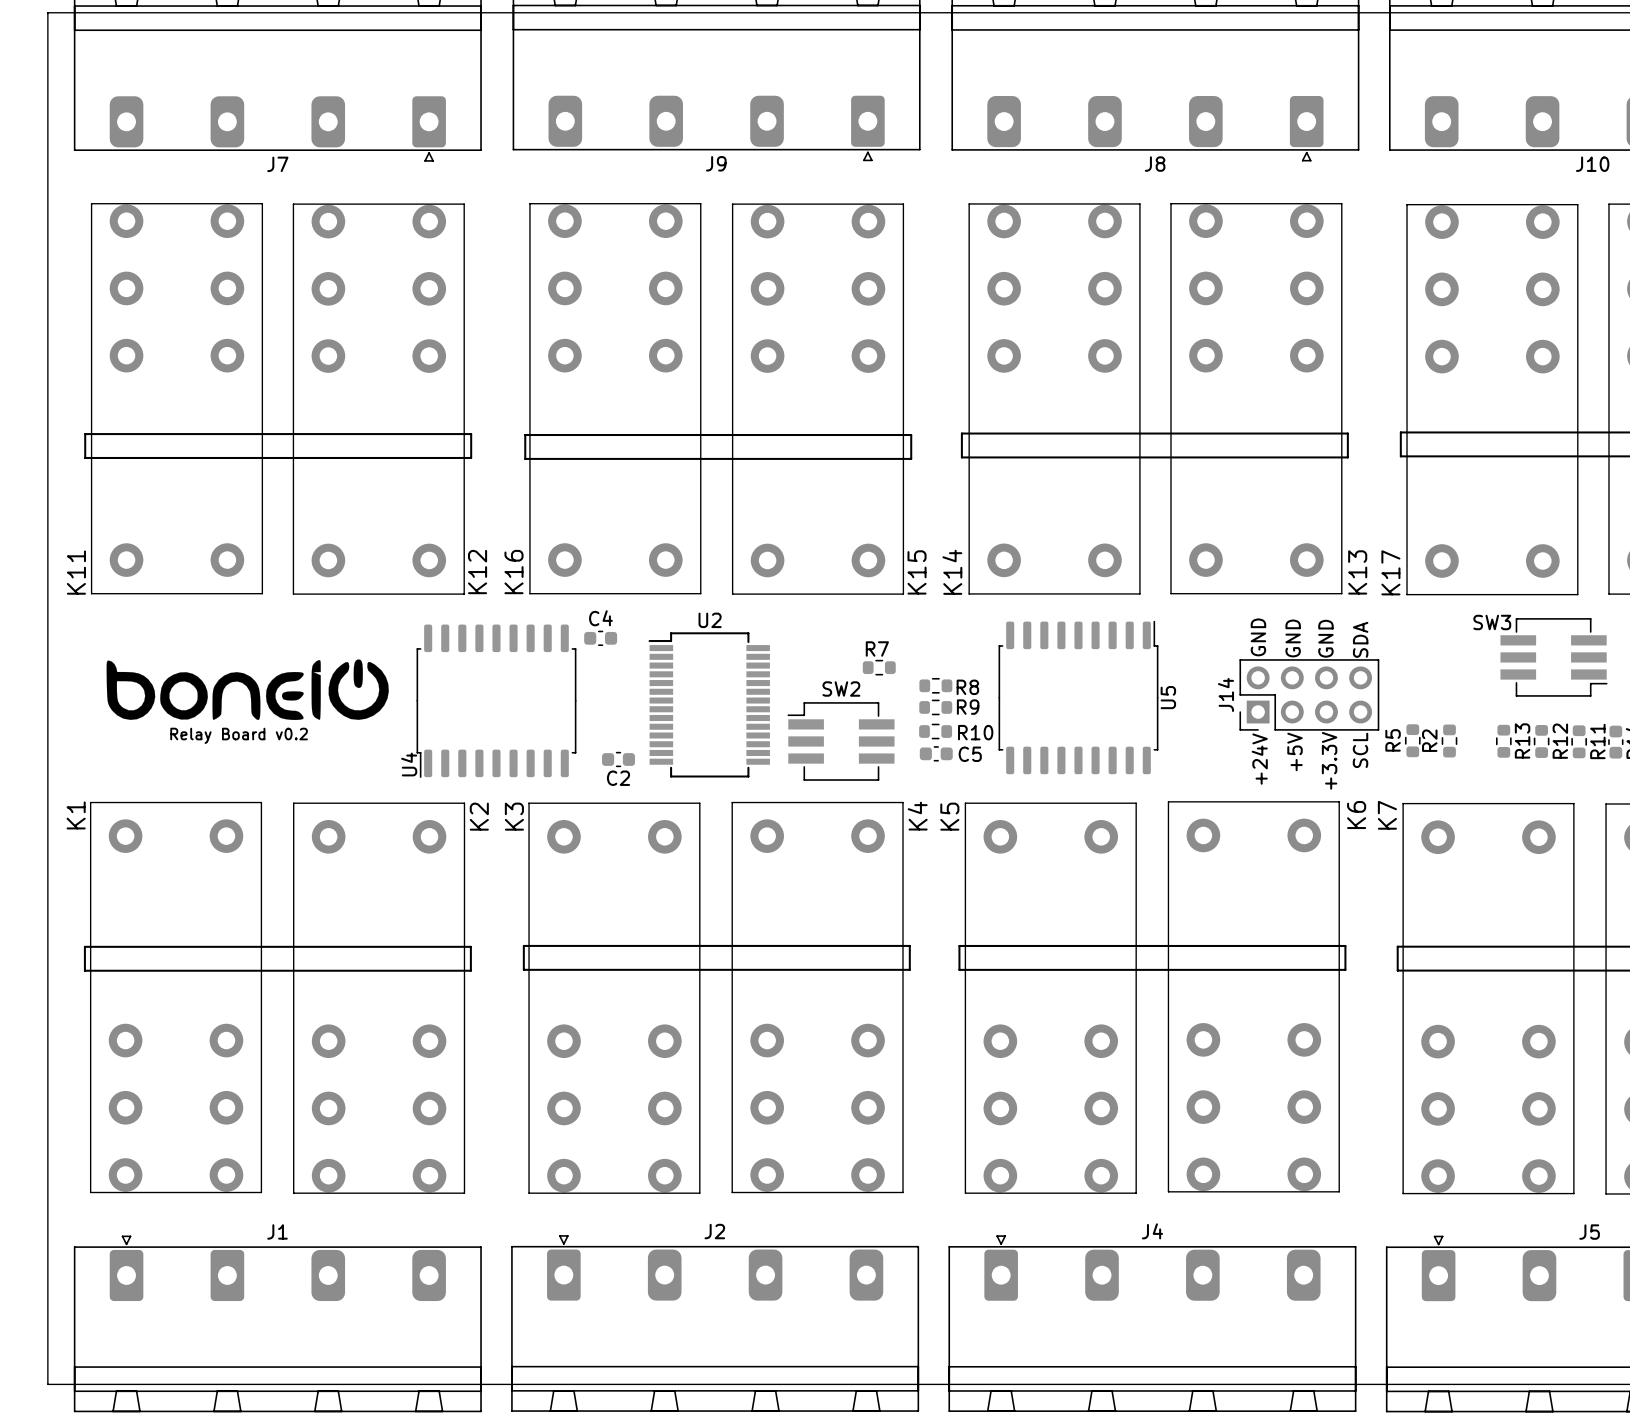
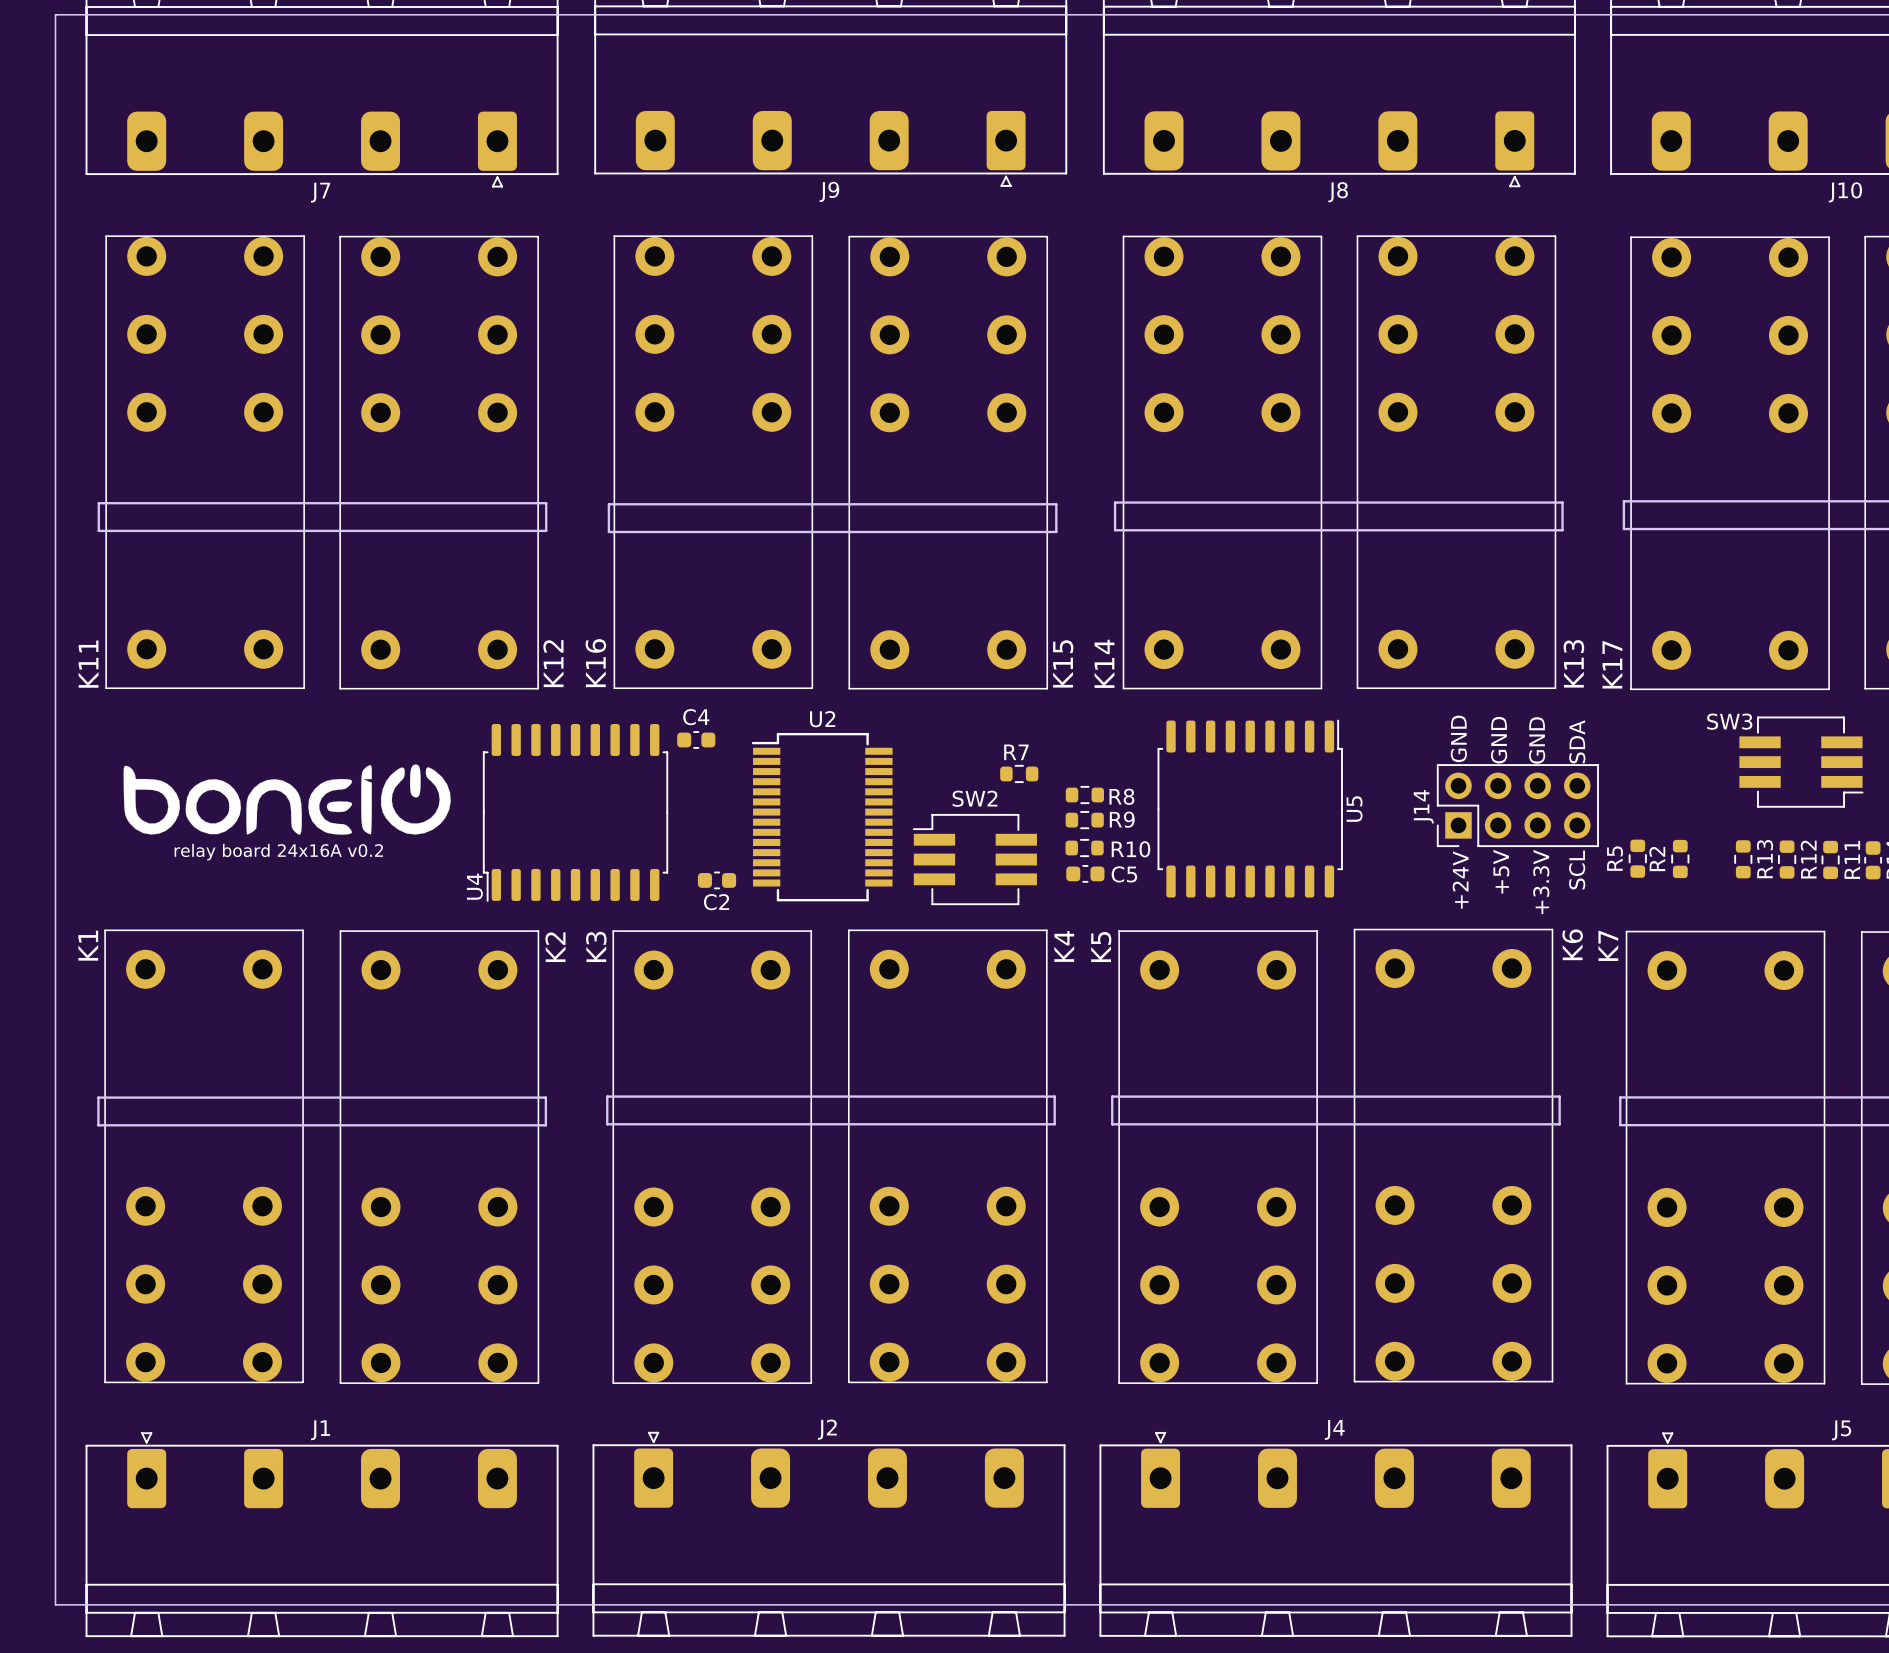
text: Relay Board v0.2 (239, 735) -> relay board 24x16A v0.2 (278, 852)

